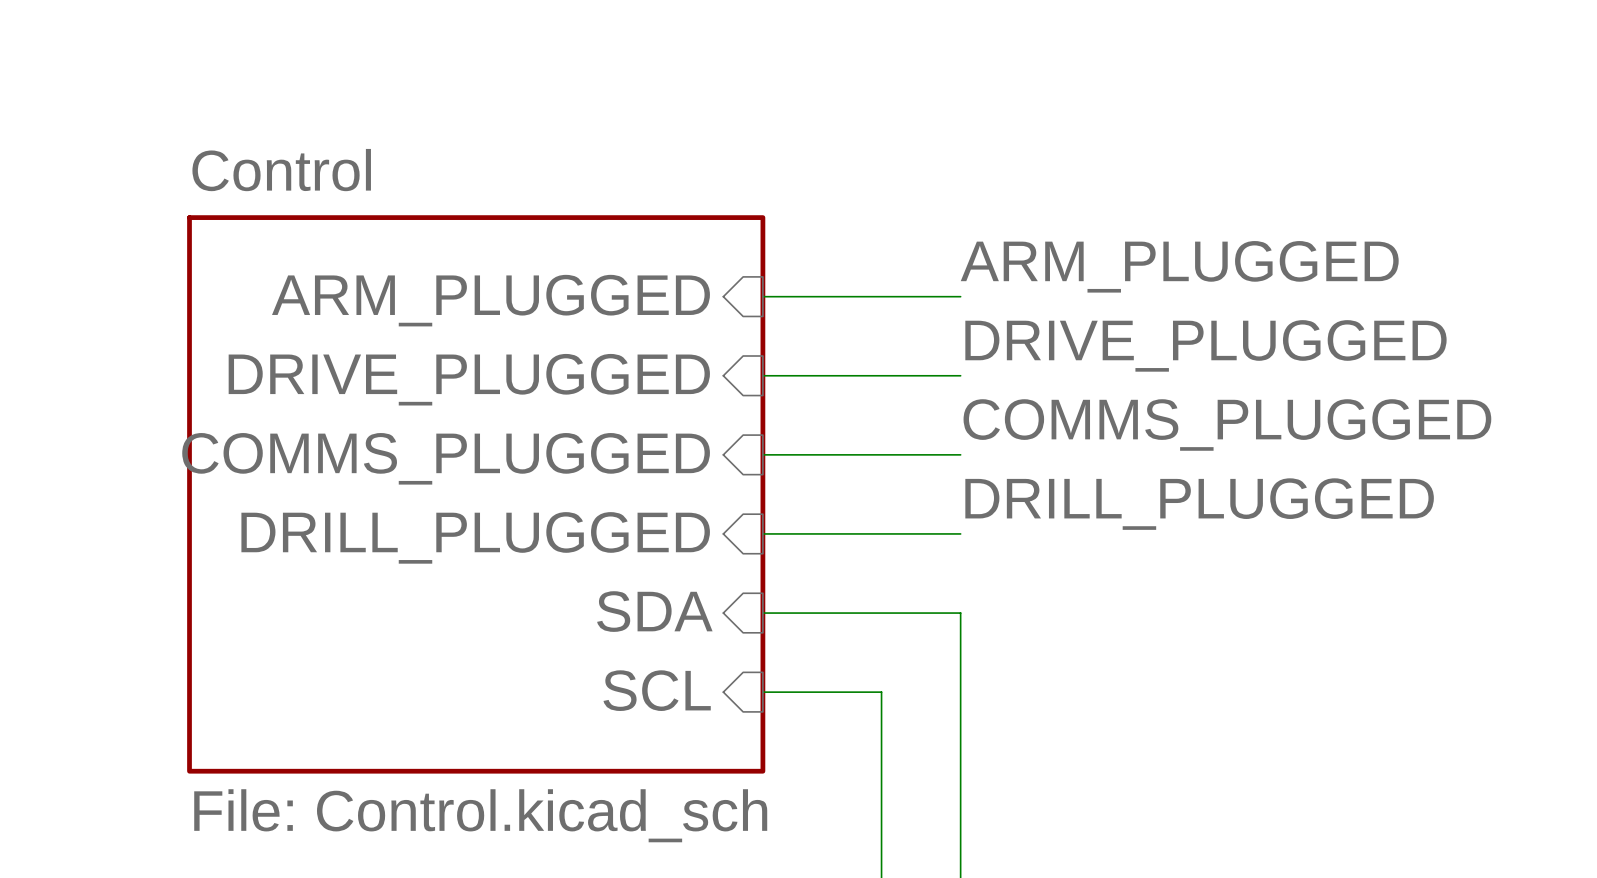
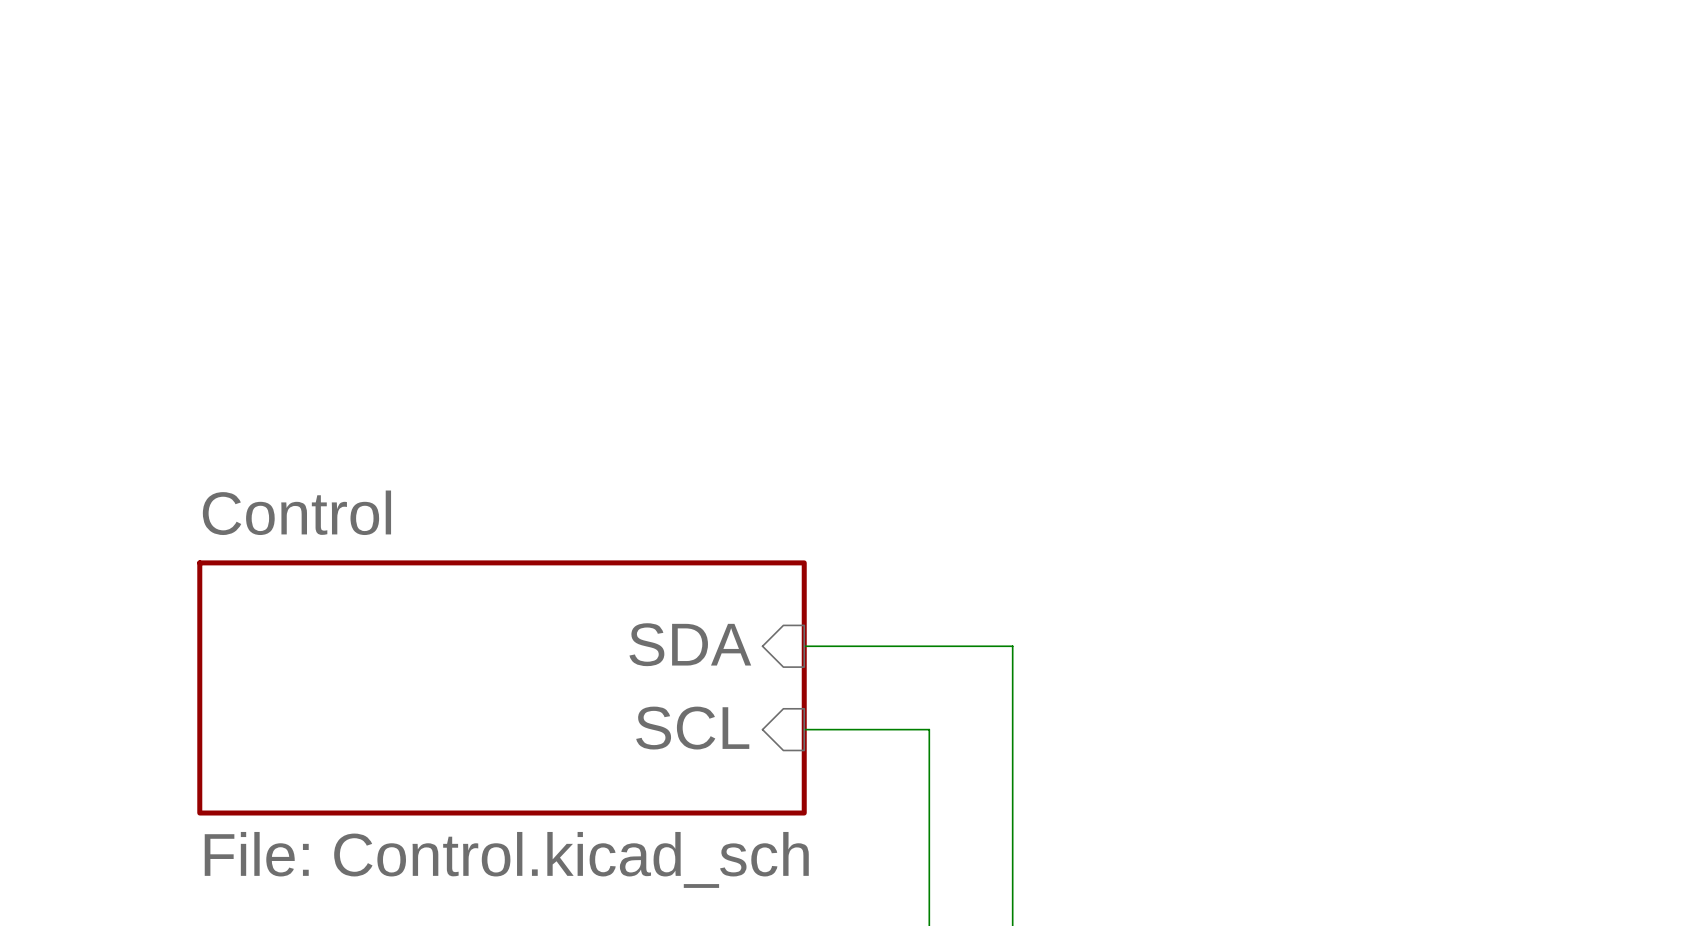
label: ARM_PLUGGED (1179, 266) -> none
wire: (762, 296) (960, 296) -> none
sheet pin: ARM_PLUGGED (490, 300) -> none
label: DRIVE_PLUGGED (1205, 345) -> none
wire: (762, 375) (960, 375) -> none
sheet pin: DRIVE_PLUGGED (469, 379) -> none
label: COMMS_PLUGGED (1227, 424) -> none
wire: (762, 454) (960, 454) -> none
sheet pin: COMMS_PLUGGED (446, 458) -> none
sheet Control: File: Control.kicad_sch (476, 494) -> none
label: DRILL_PLUGGED (1199, 504) -> none
wire: (762, 533) (960, 533) -> none
sheet pin: DRILL_PLUGGED (475, 537) -> none
sheet Control: none -> File: Control.kicad_sch (502, 687)

